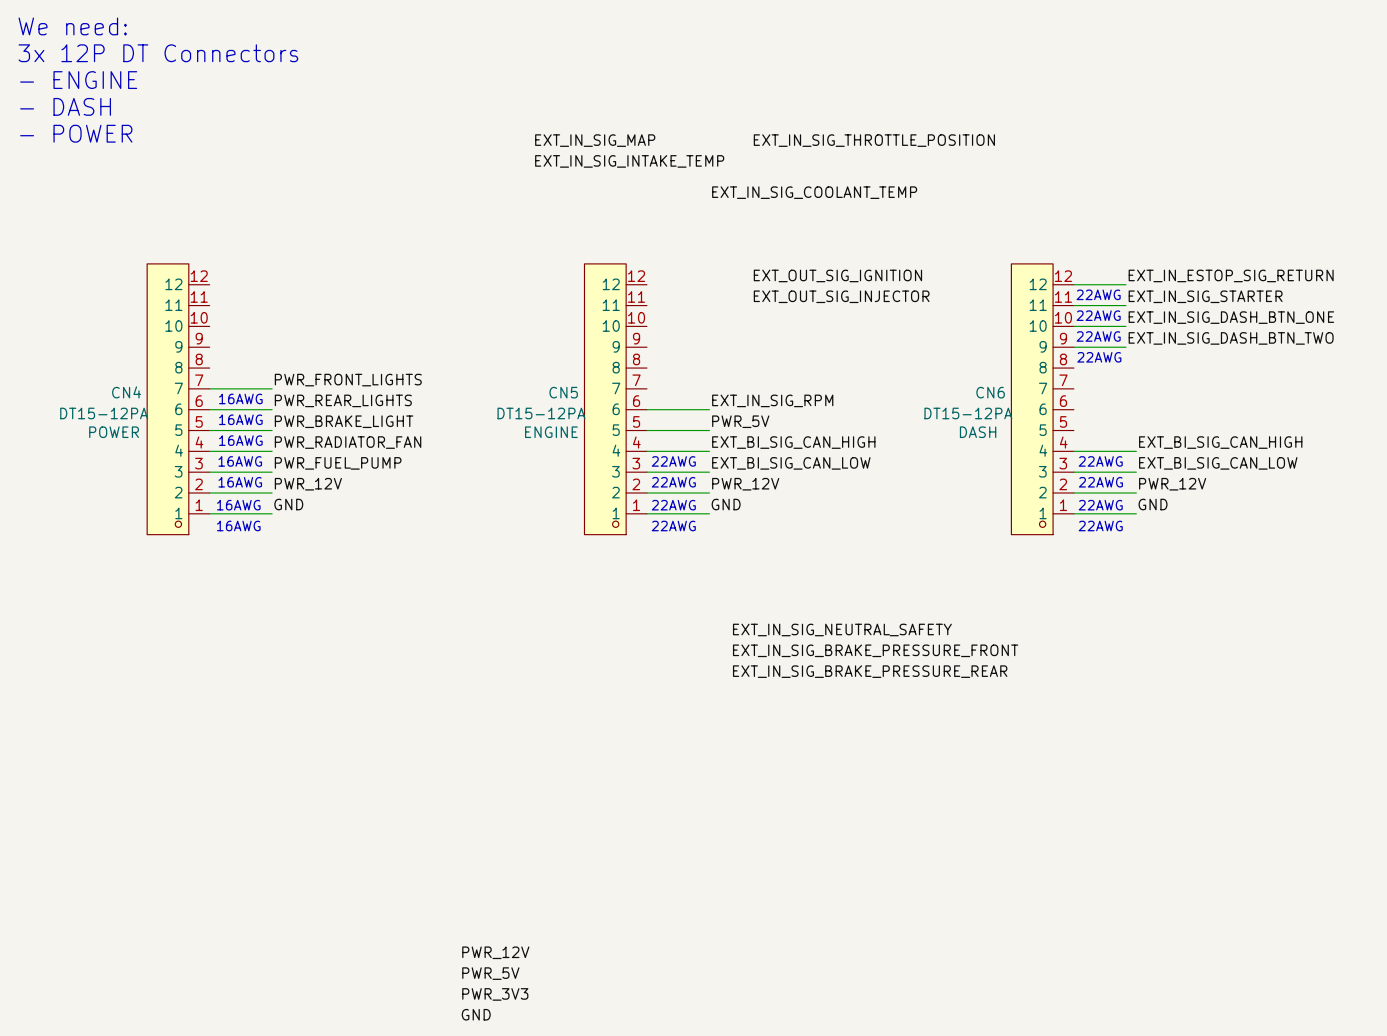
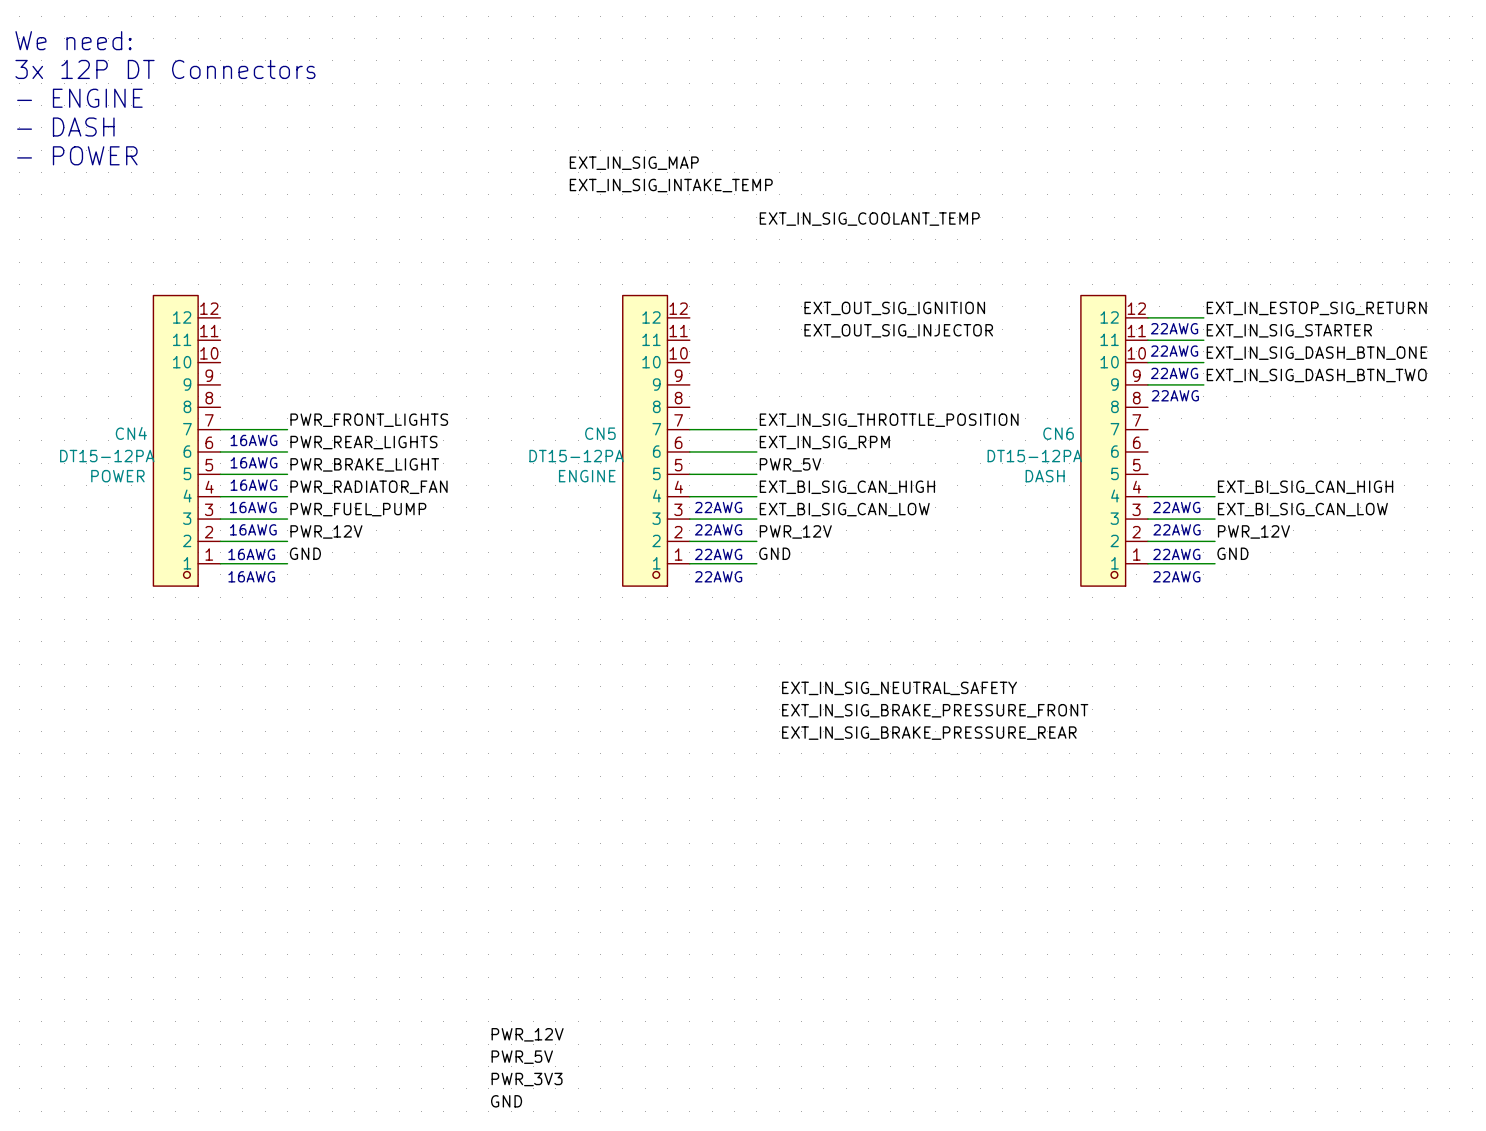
label: EXT_IN_SIG_THROTTLE_POSITION (874, 140) -> none
label: none -> EXT_IN_SIG_THROTTLE_POSITION (889, 420)
wire: none -> (689, 429) (756, 429)

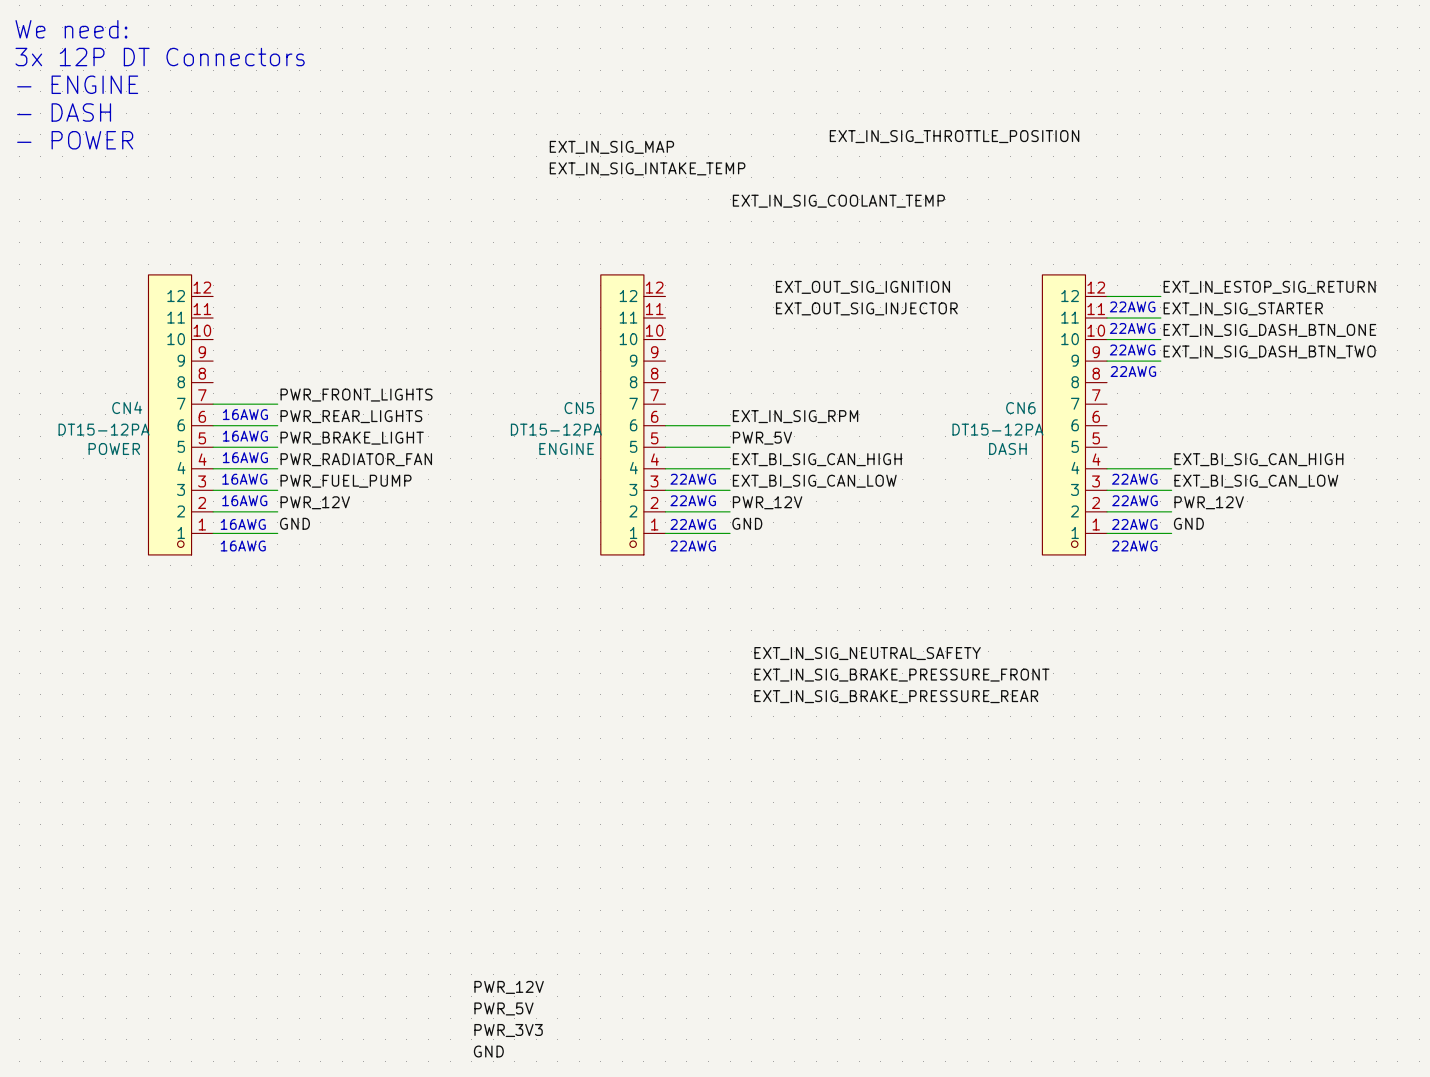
label: none -> EXT_IN_SIG_THROTTLE_POSITION (954, 136)
label: EXT_IN_SIG_THROTTLE_POSITION (889, 420) -> none
wire: (689, 429) (756, 429) -> none

